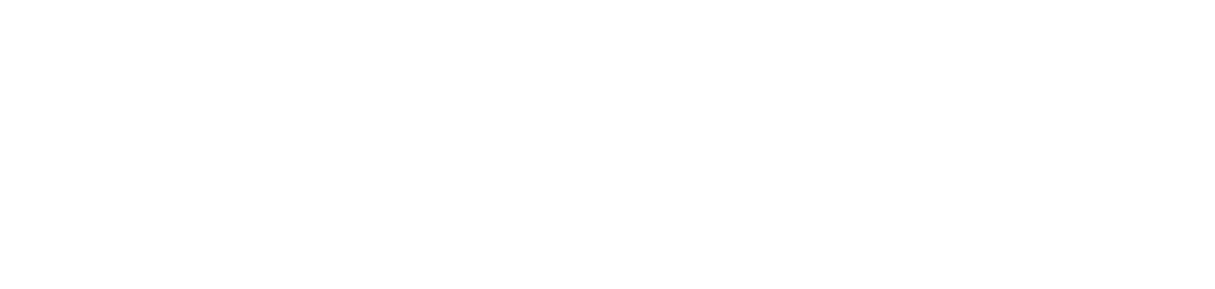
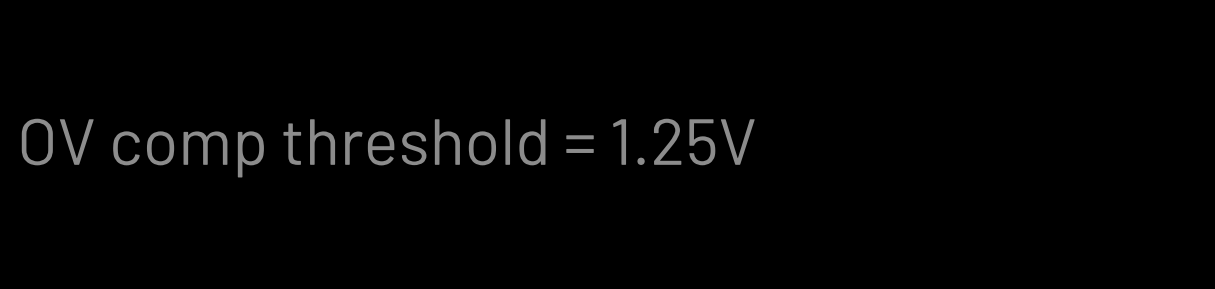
text: none -> OV comp threshold = 1.25V (388, 148)

